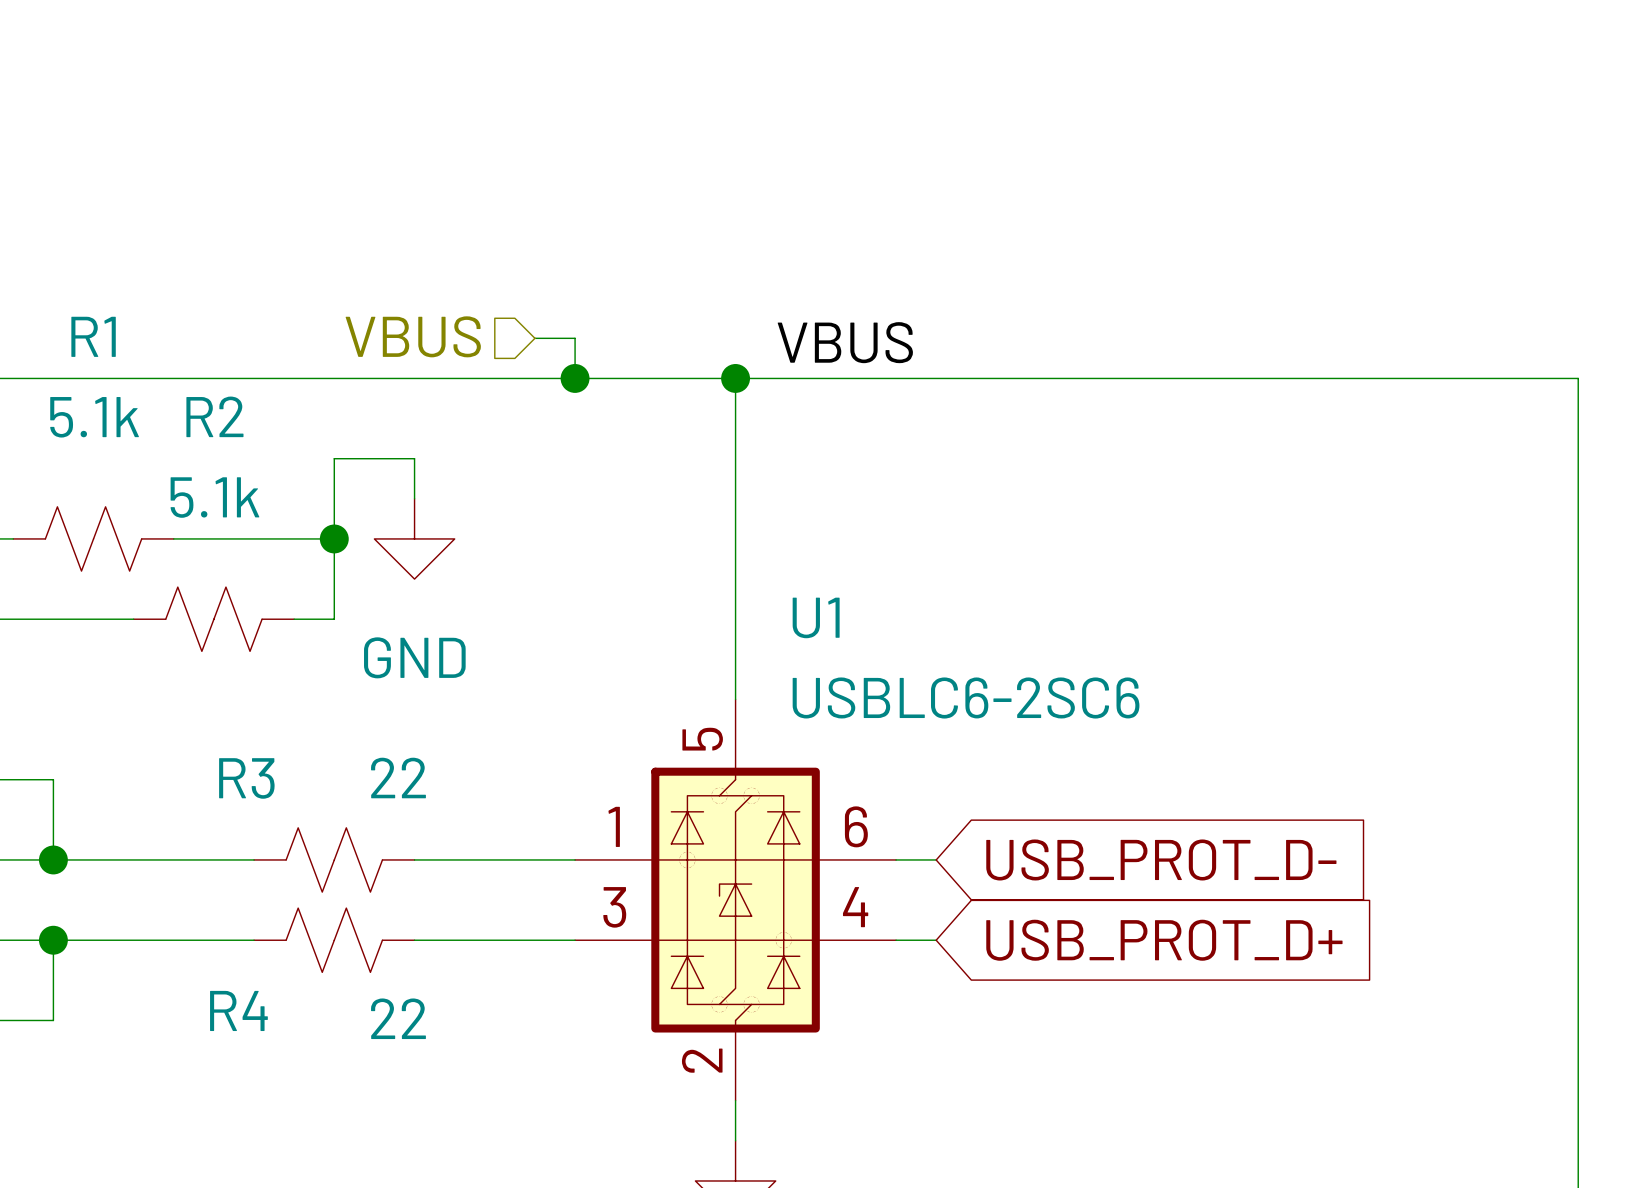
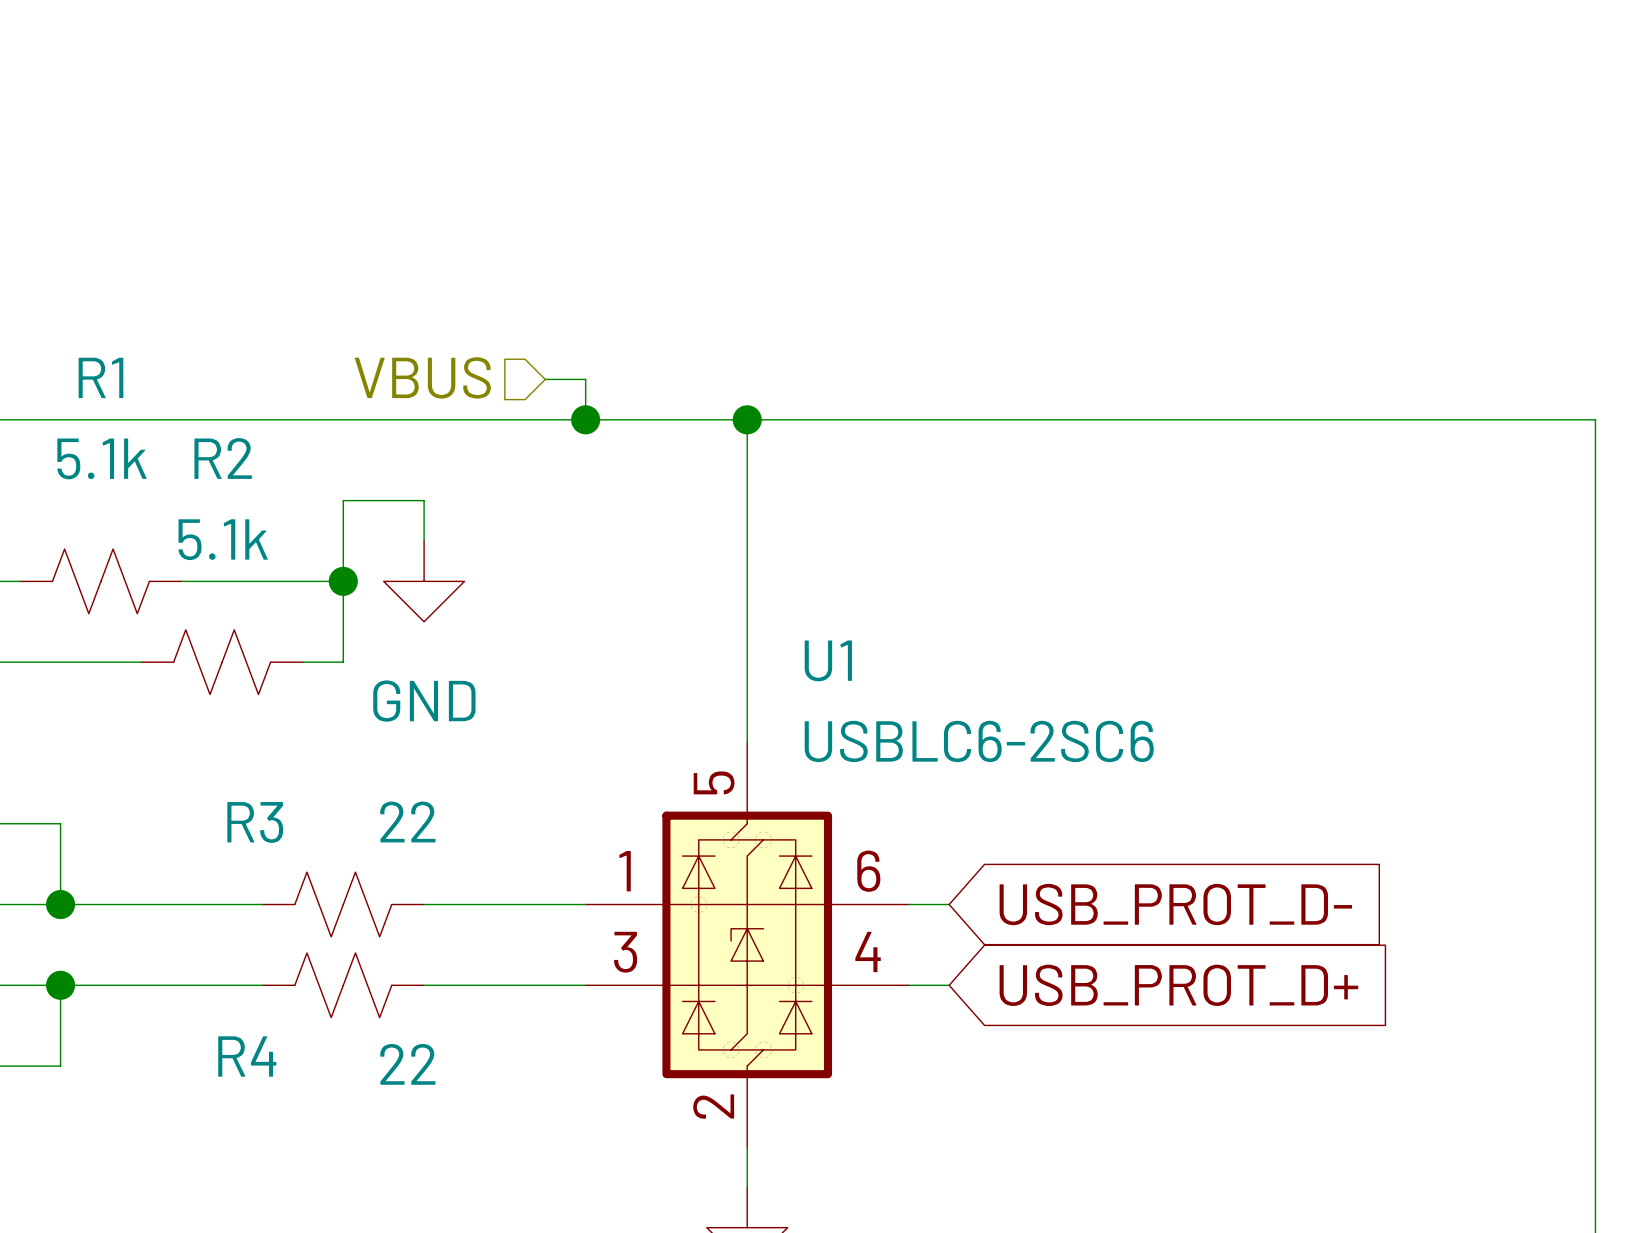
label: VBUS (845, 342) -> none

